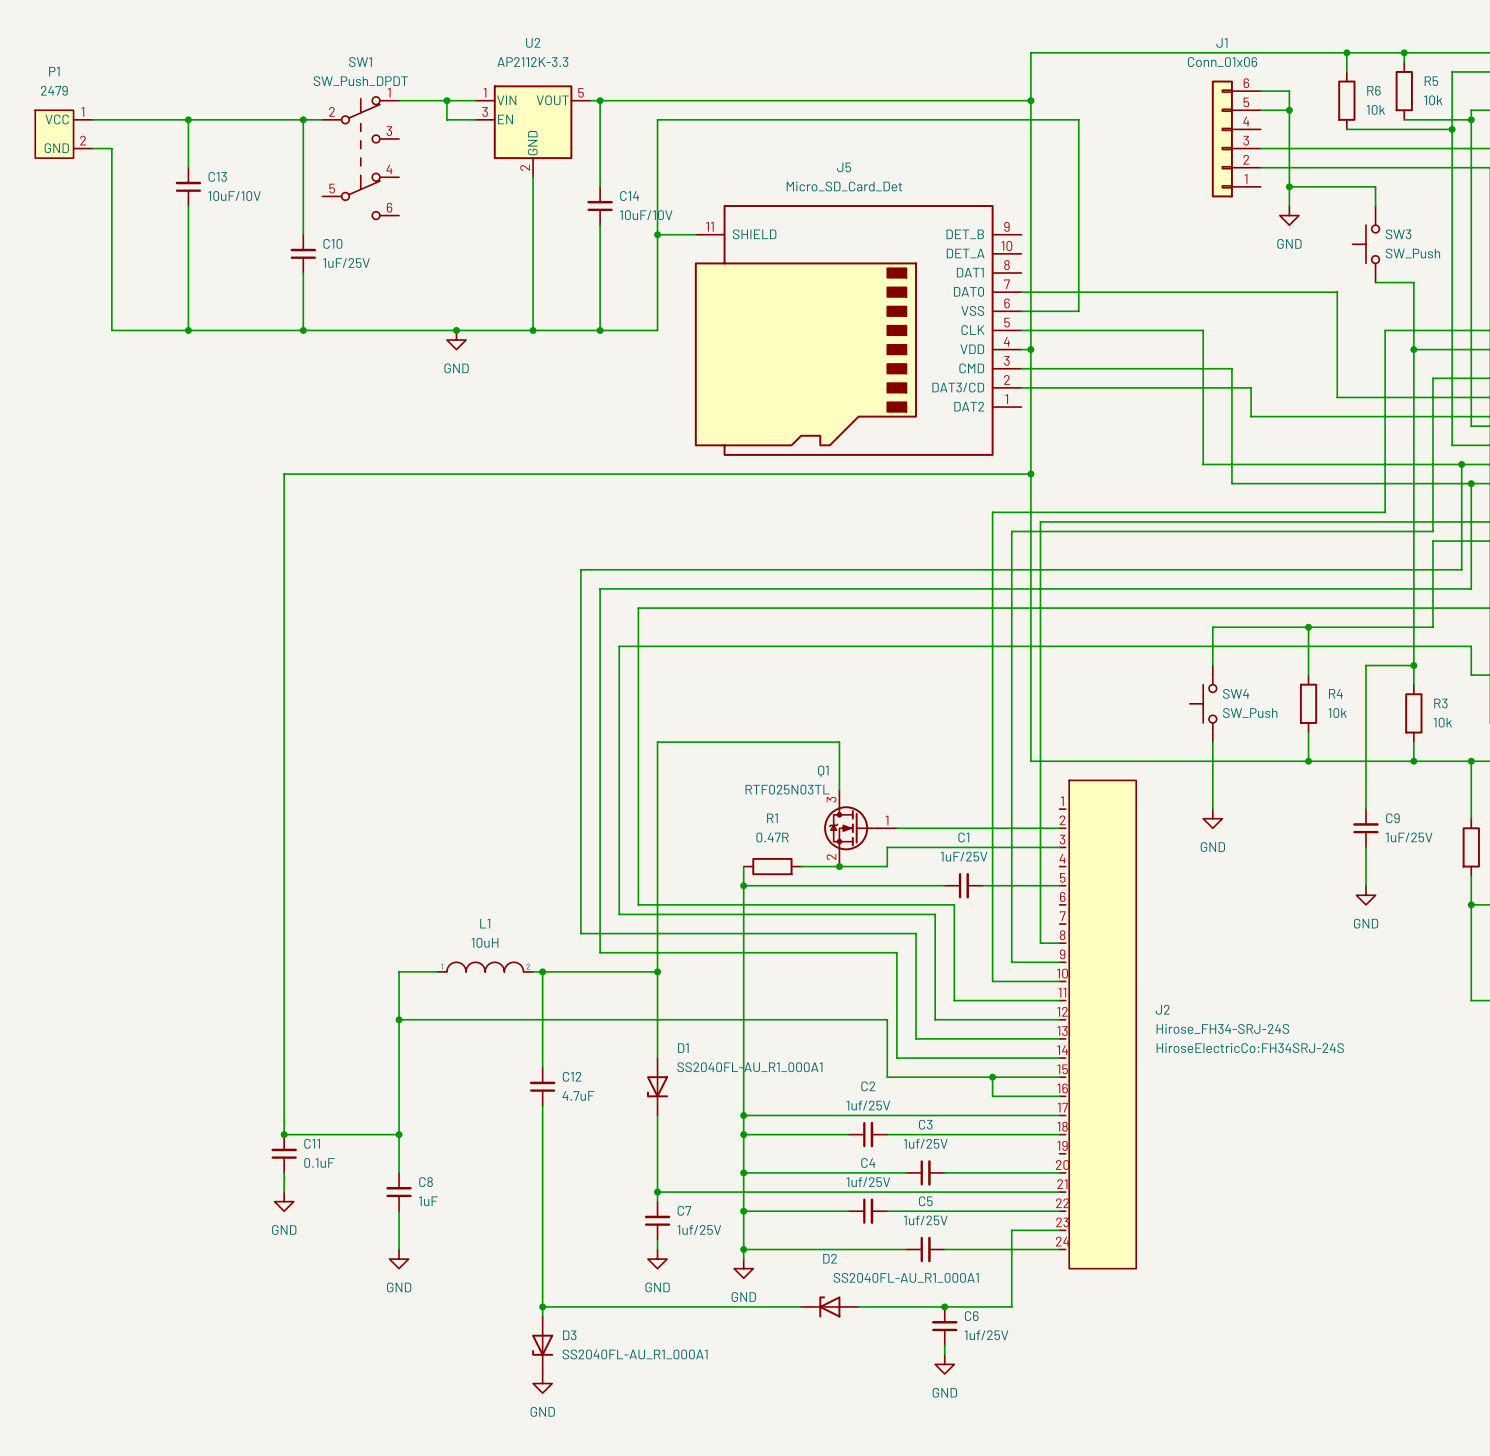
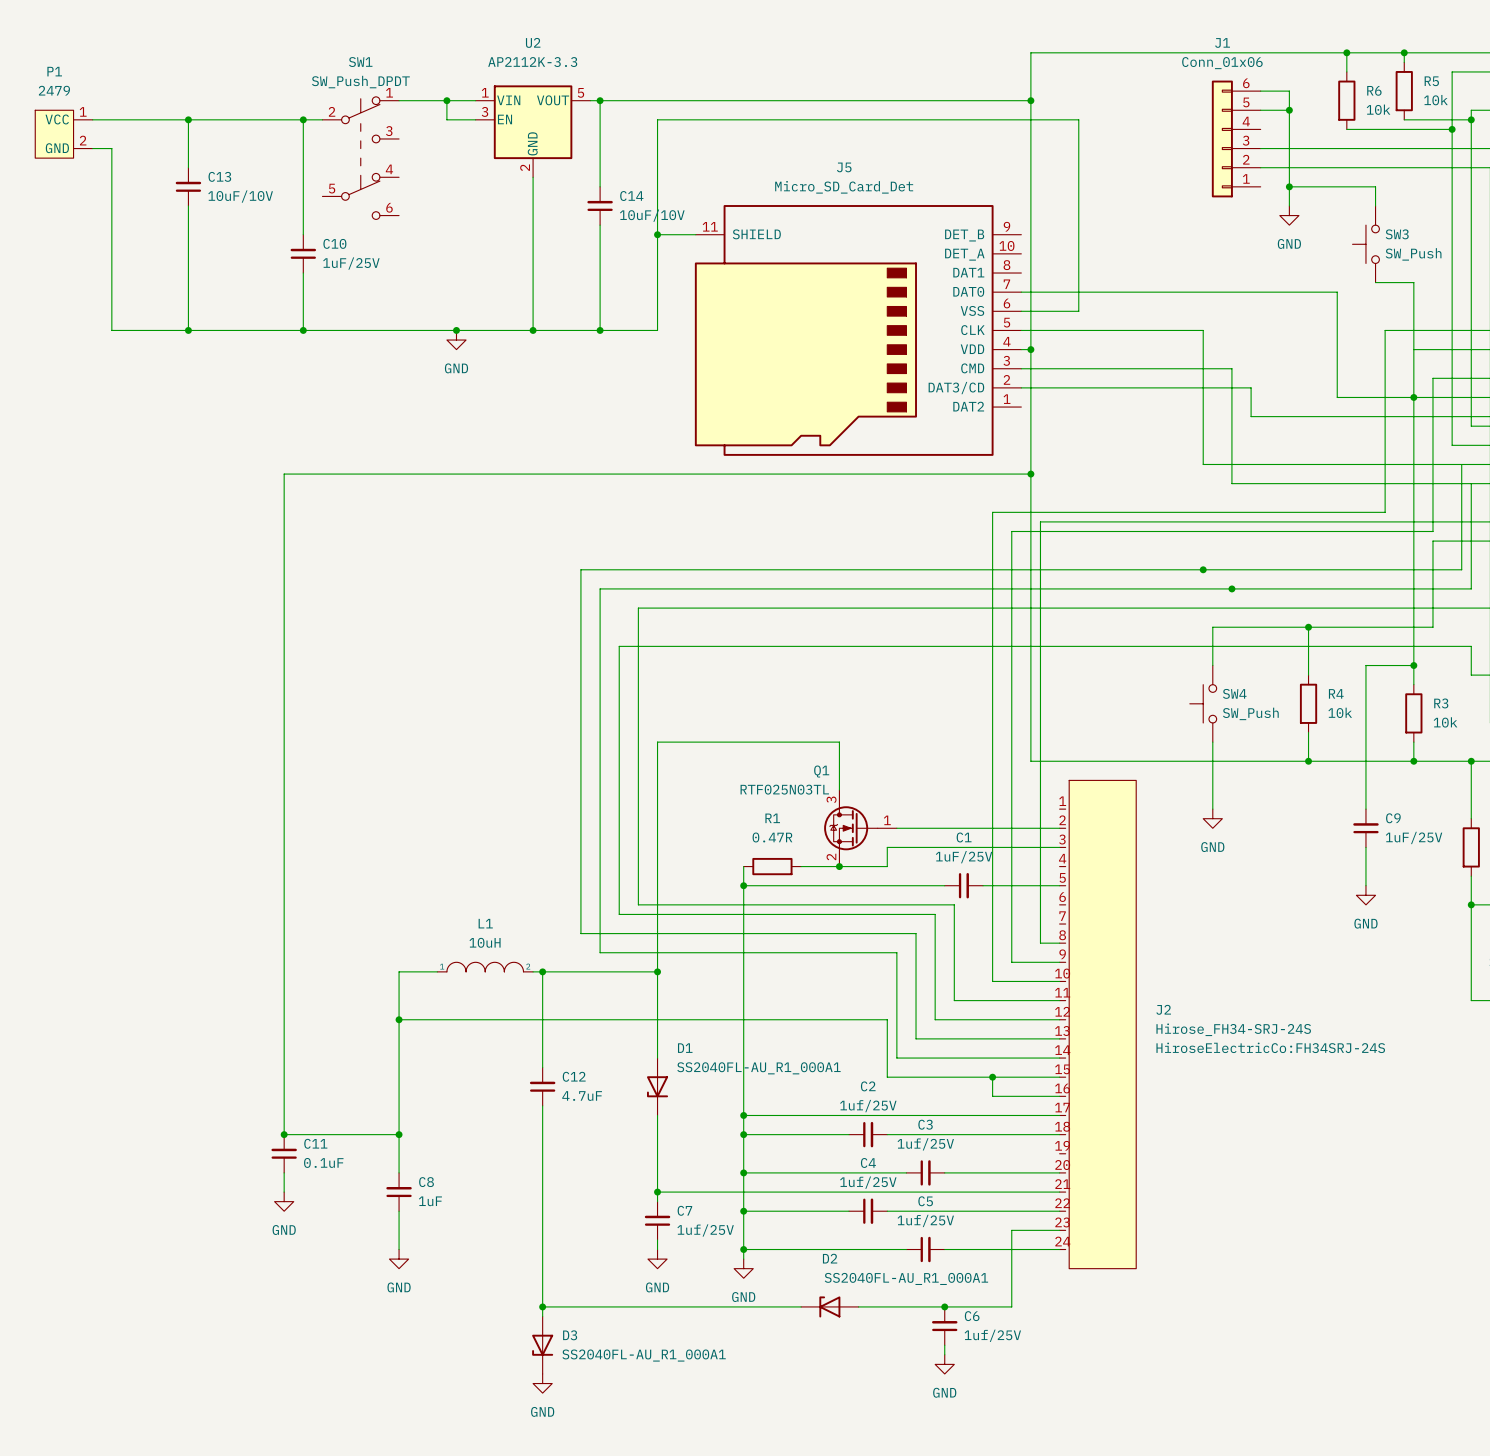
junction: (1413, 349) -> none
junction: none -> (1413, 397)
junction: (1461, 464) -> none
junction: (1471, 483) -> none
junction: none -> (1203, 569)
junction: none -> (1231, 588)

